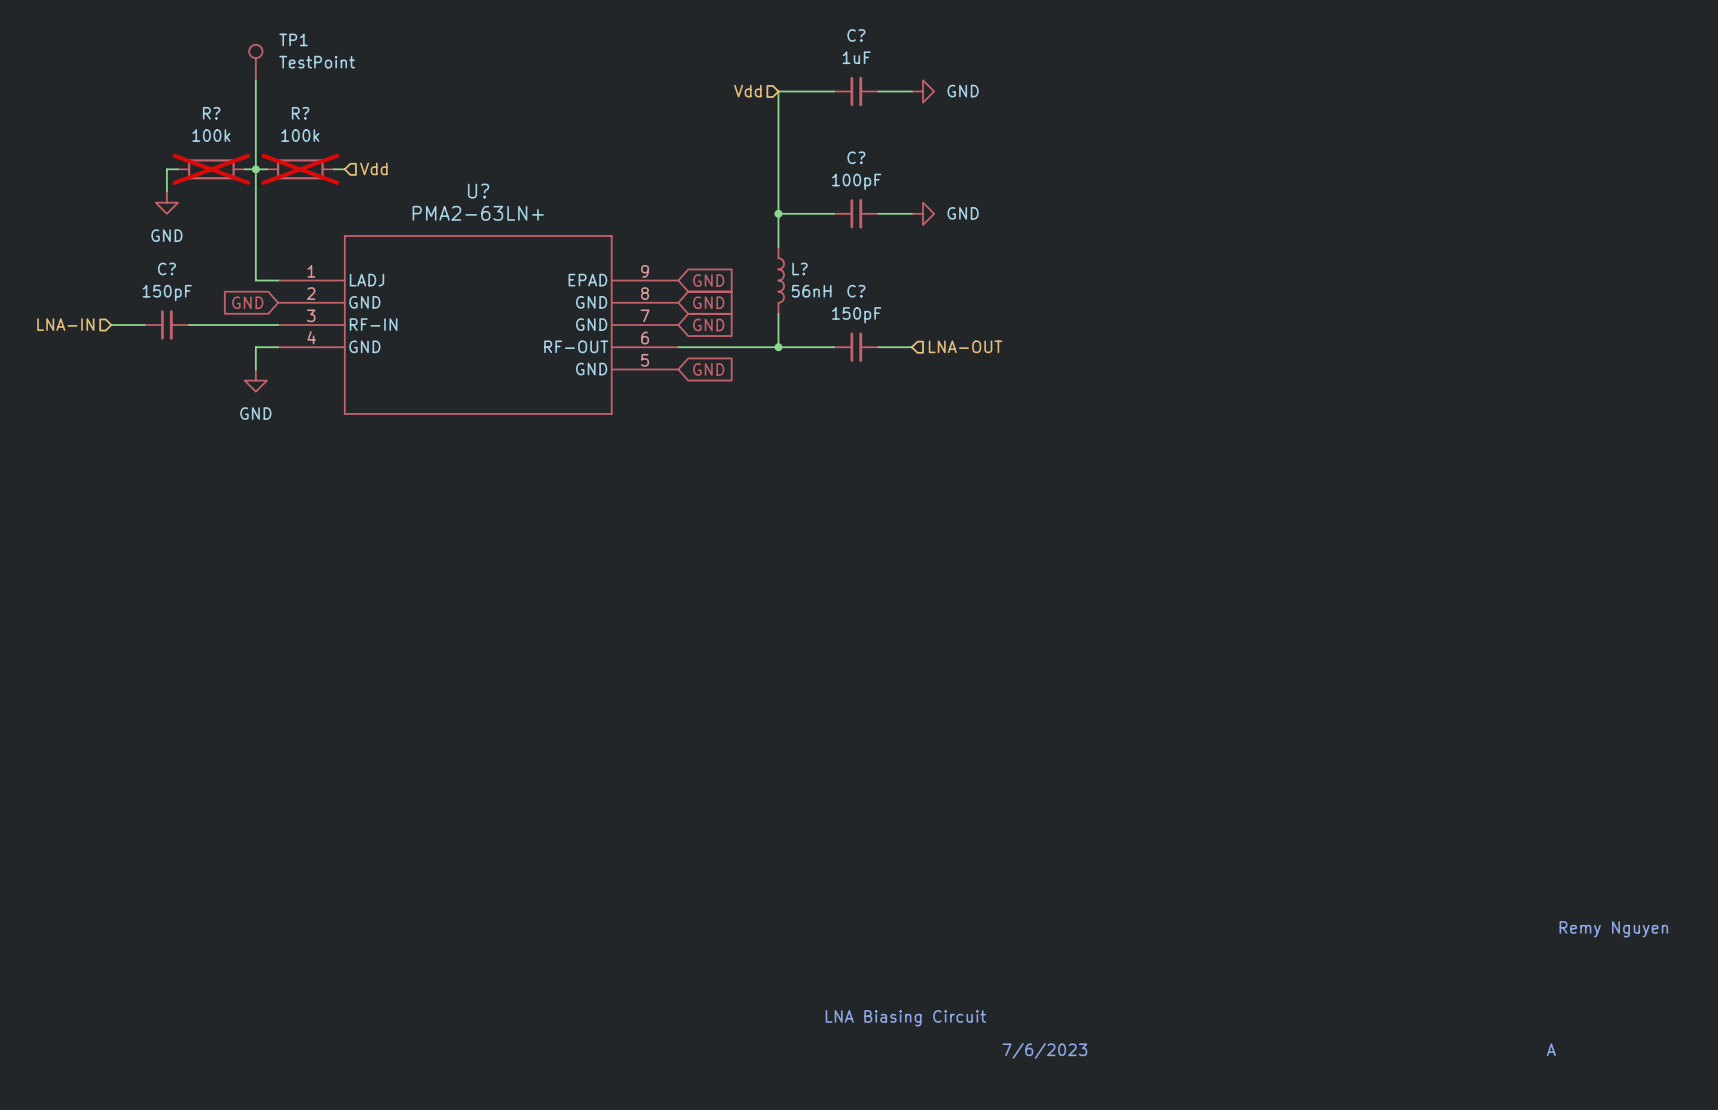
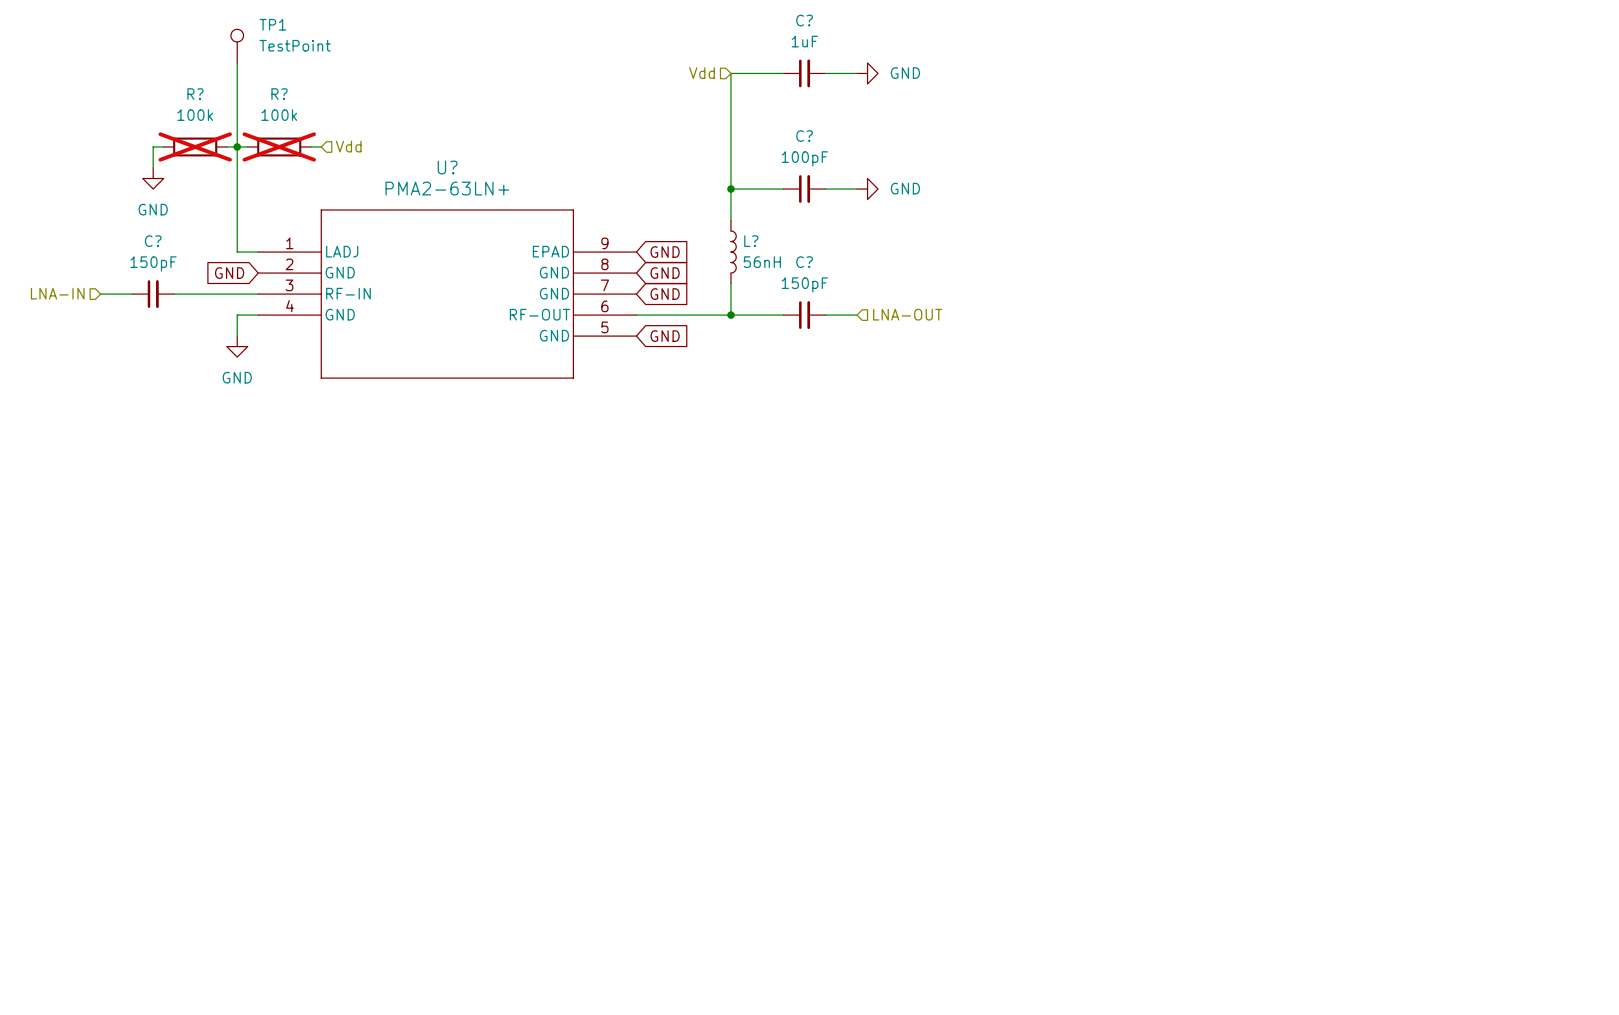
text: Remy Nguyen (1613, 929) -> none
text: LNA Biasing Circuit (905, 1018) -> none
text: A (1551, 1049) -> none
text: 7/6/2023 (1044, 1050) -> none

